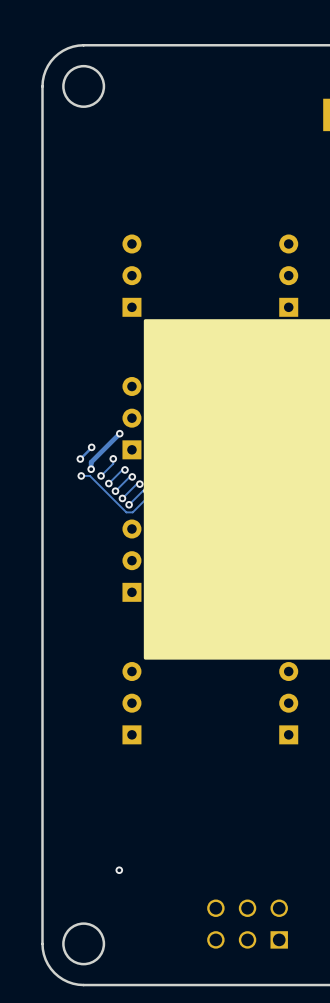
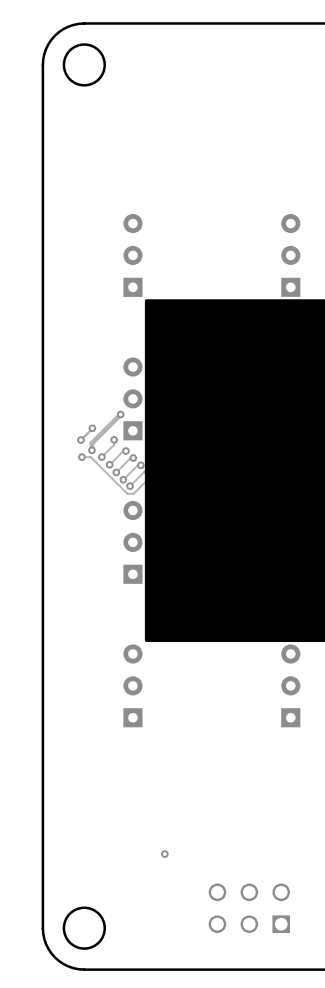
via position: (119, 870) -> (164, 854)

